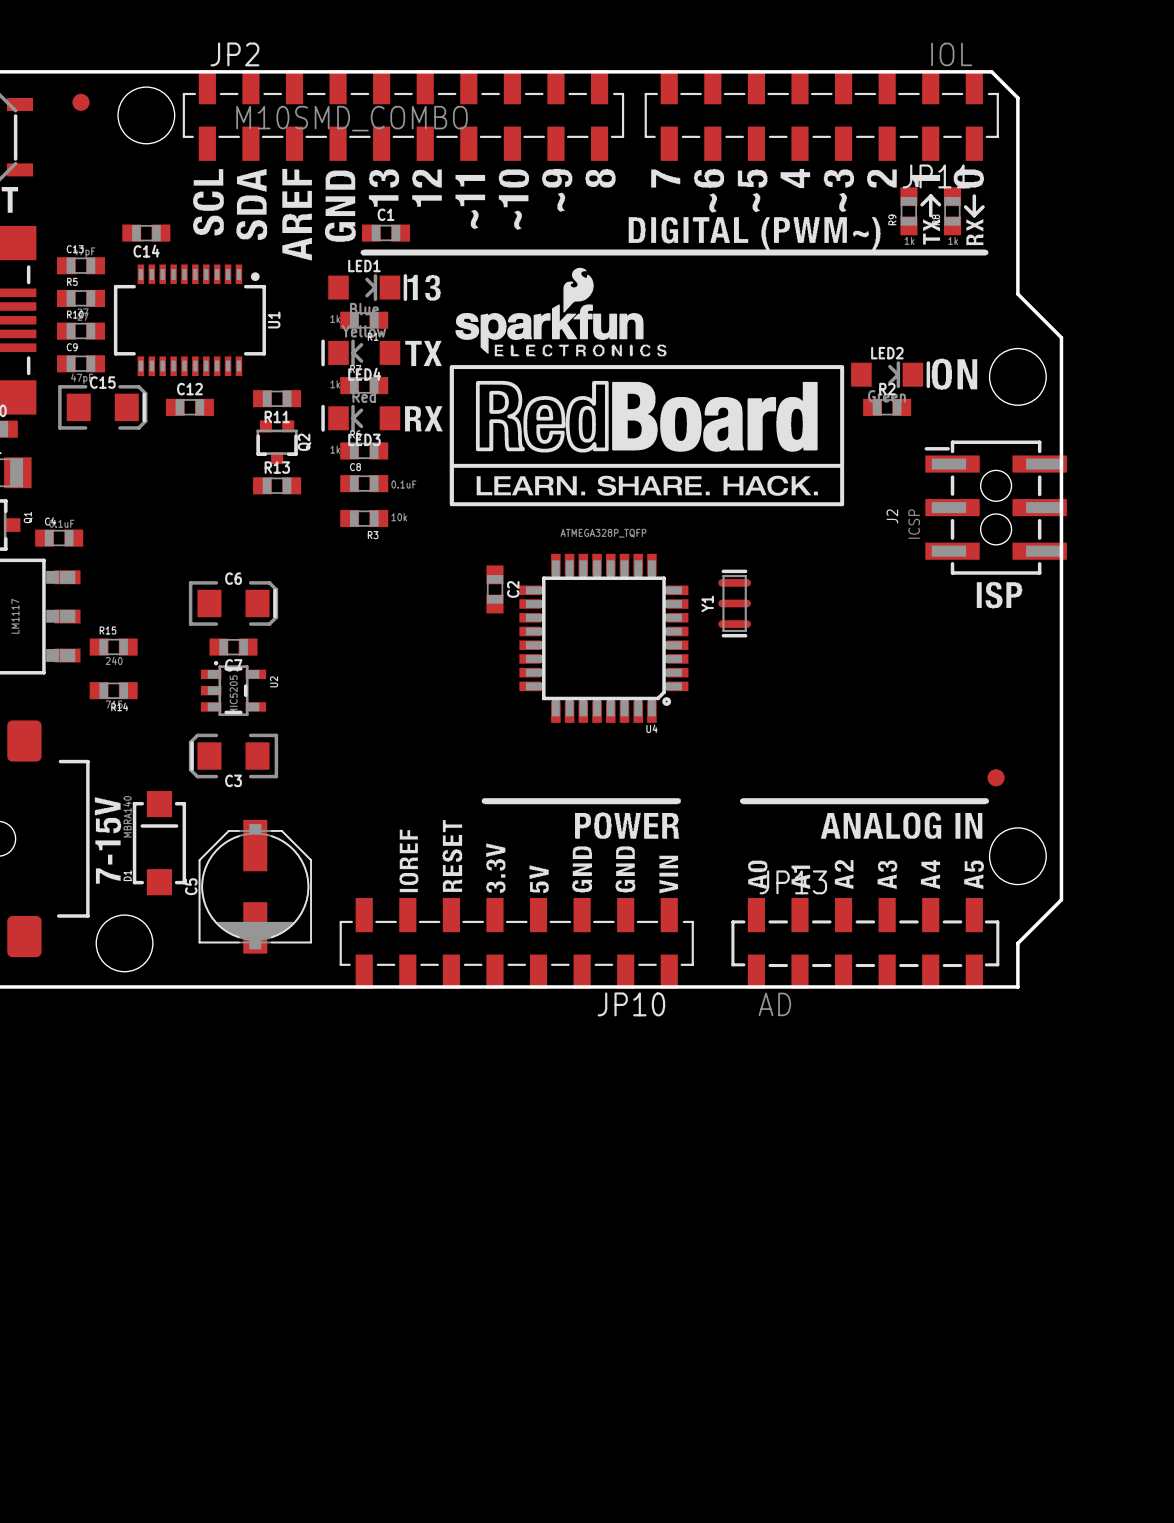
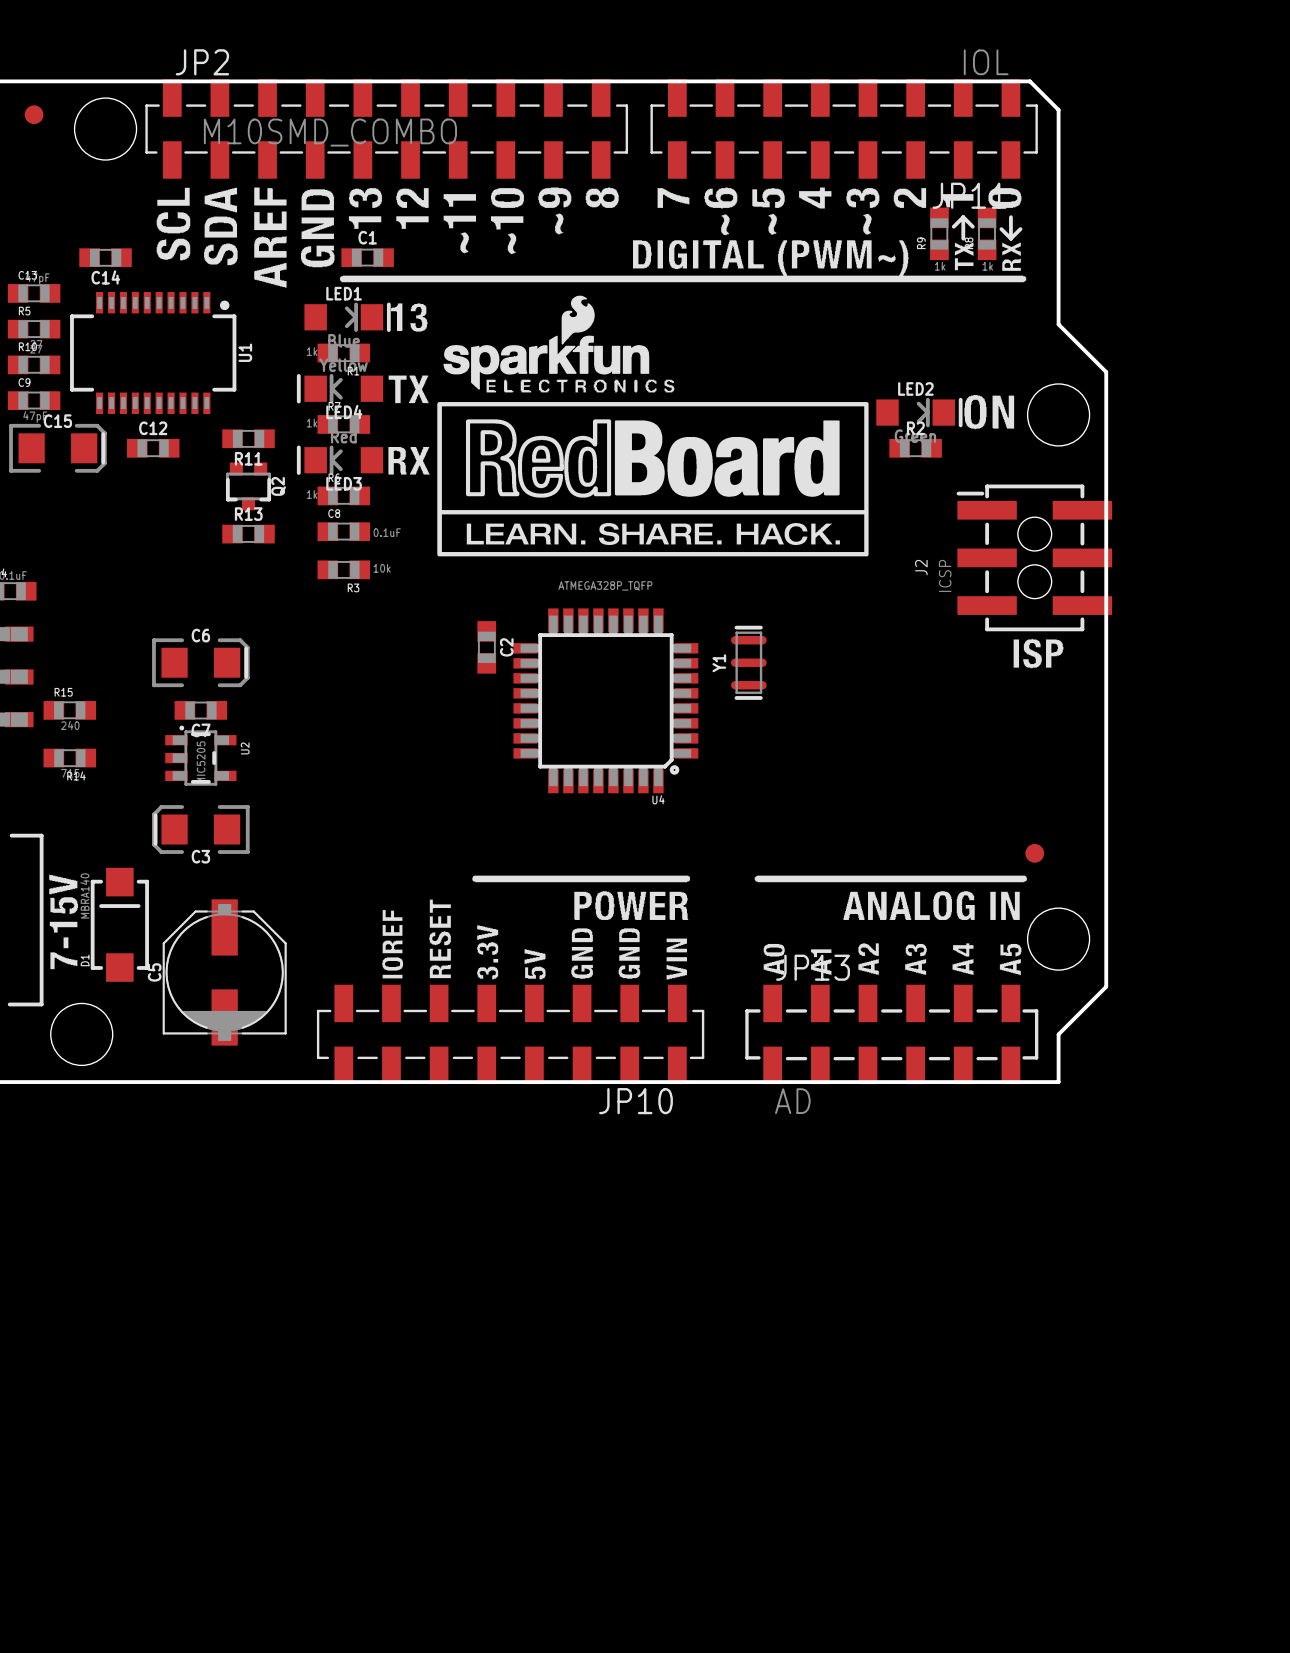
J2 footprint: [924, 440, 1067, 575] -> [956, 484, 1113, 632]

